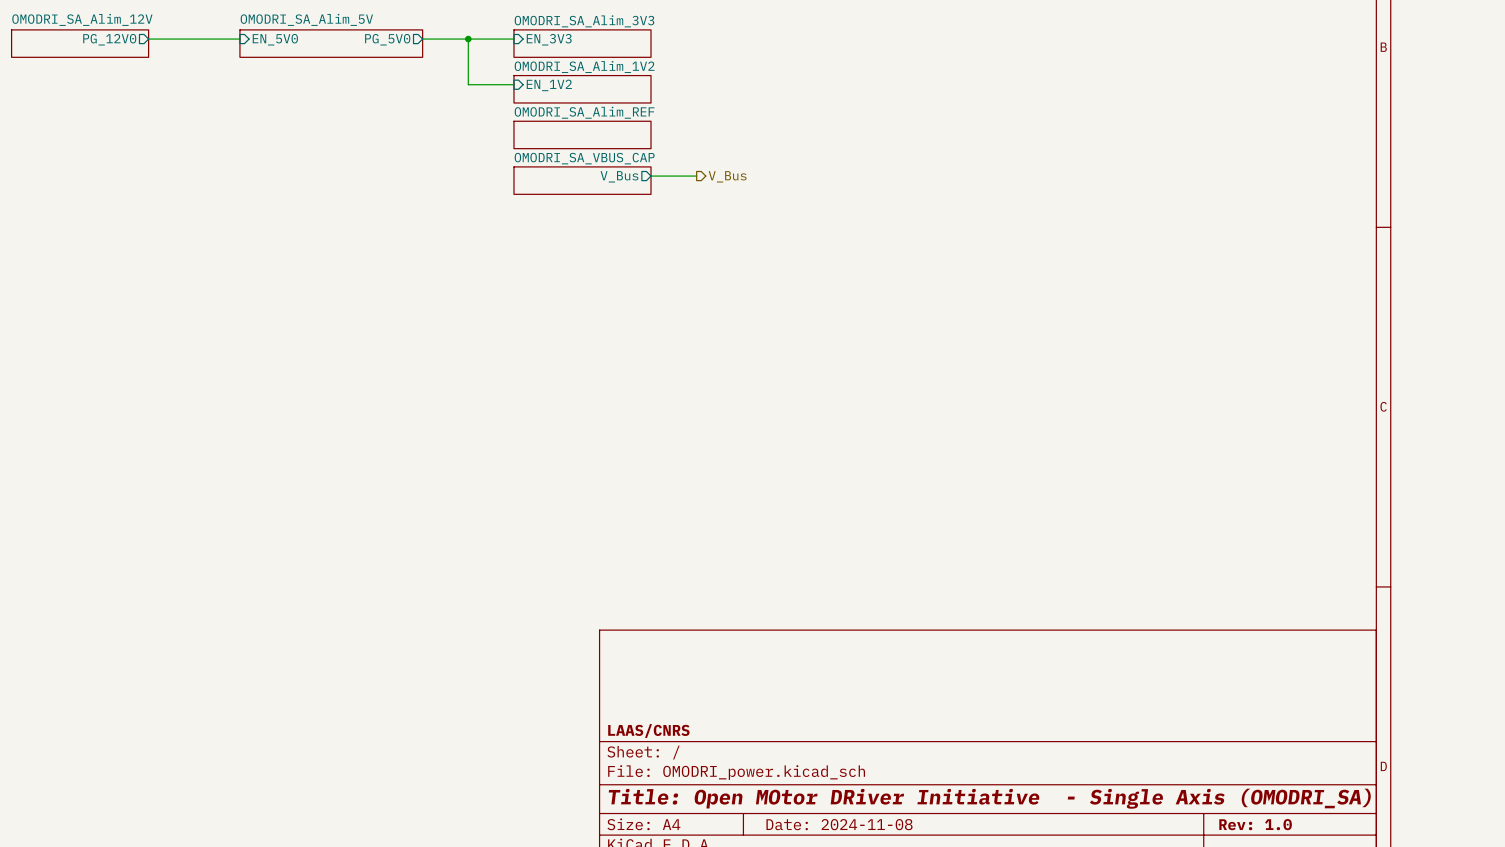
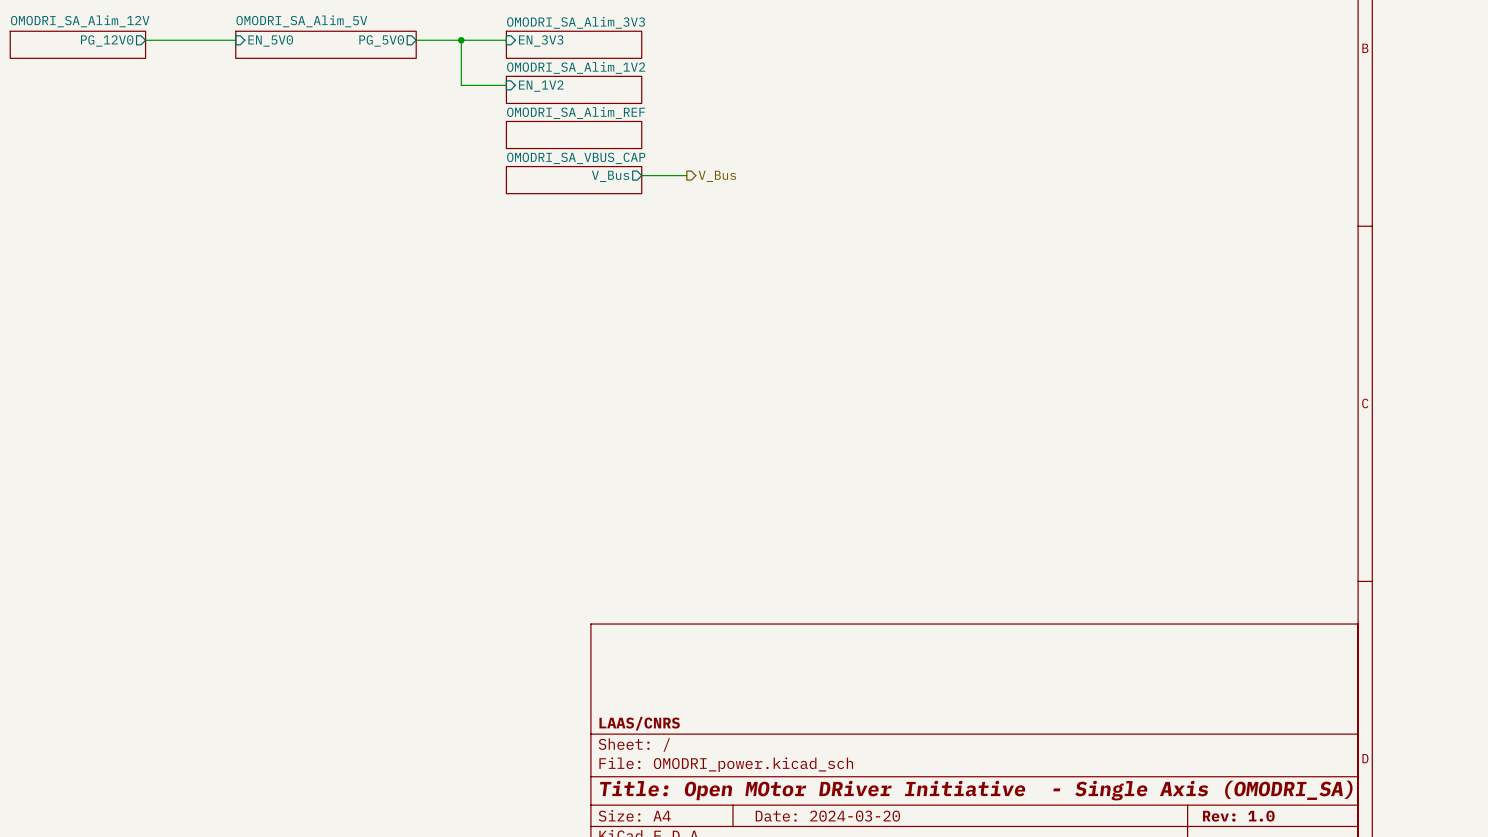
title block: Date: 2024-11-08 (839, 824) -> Date: 2024-03-20 (827, 816)

